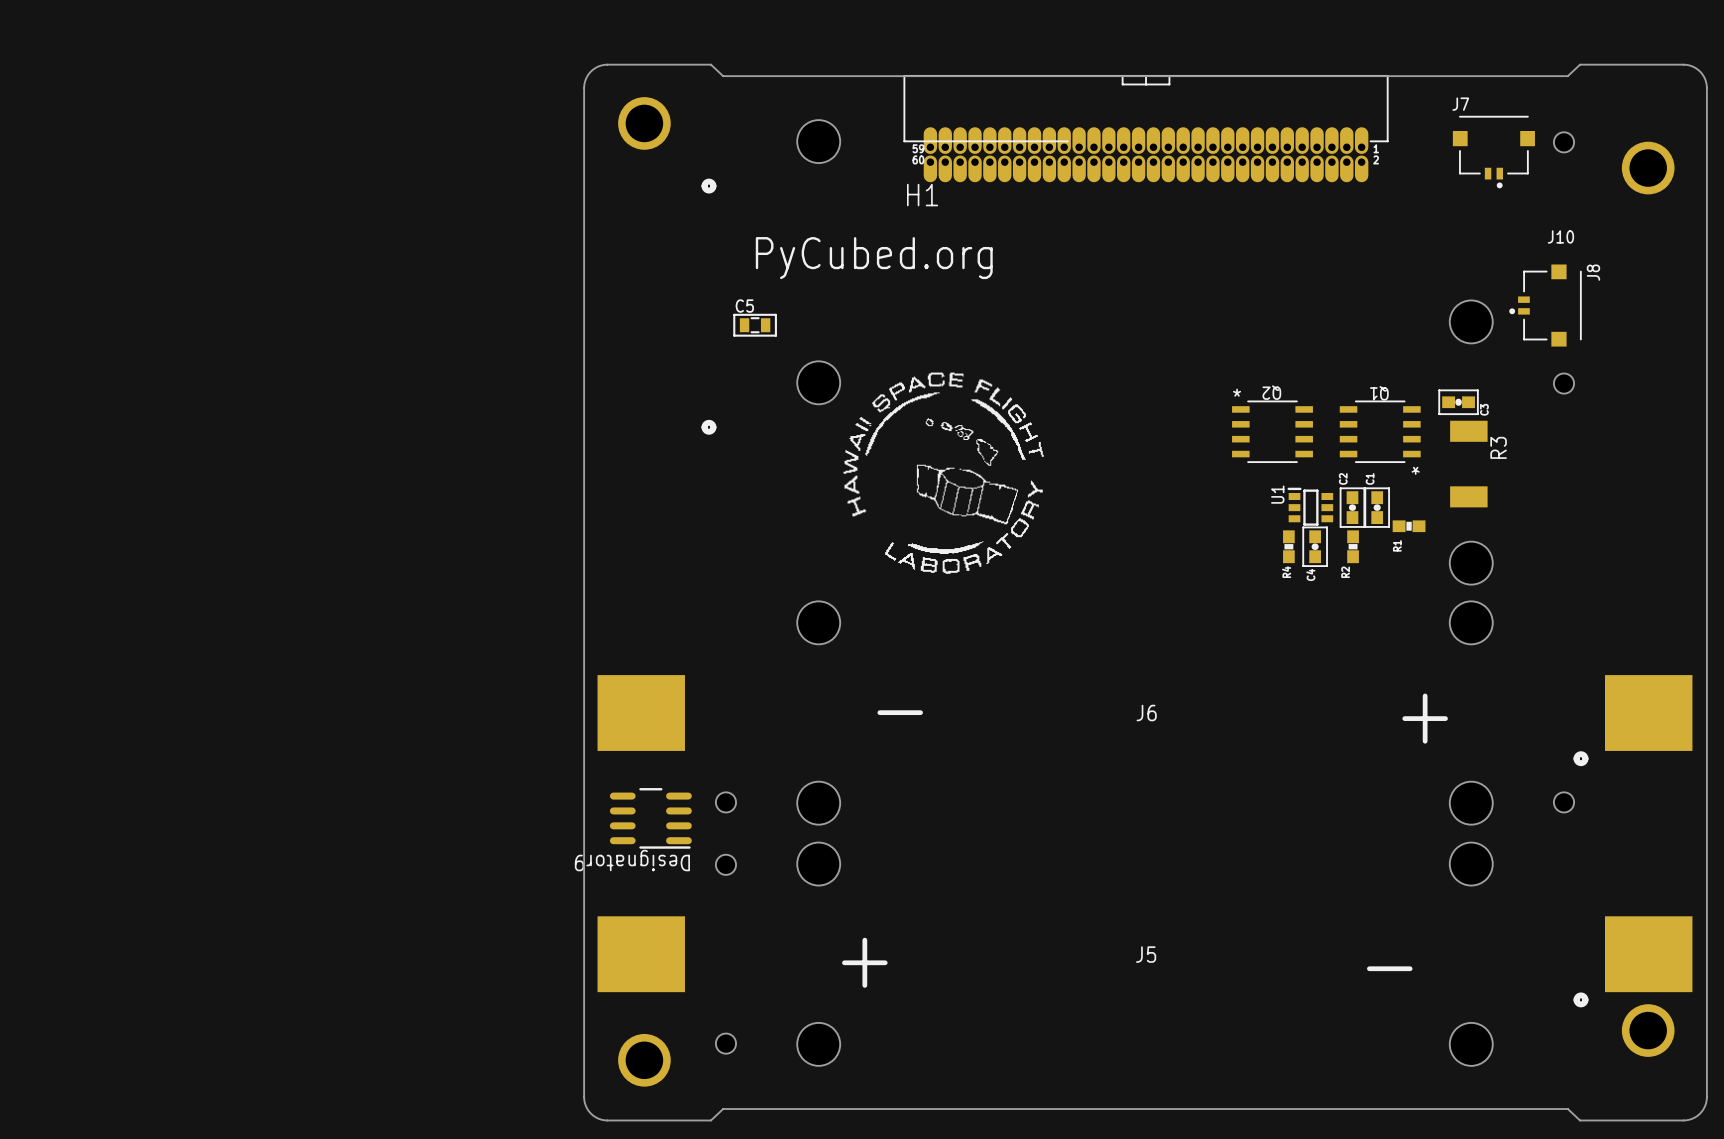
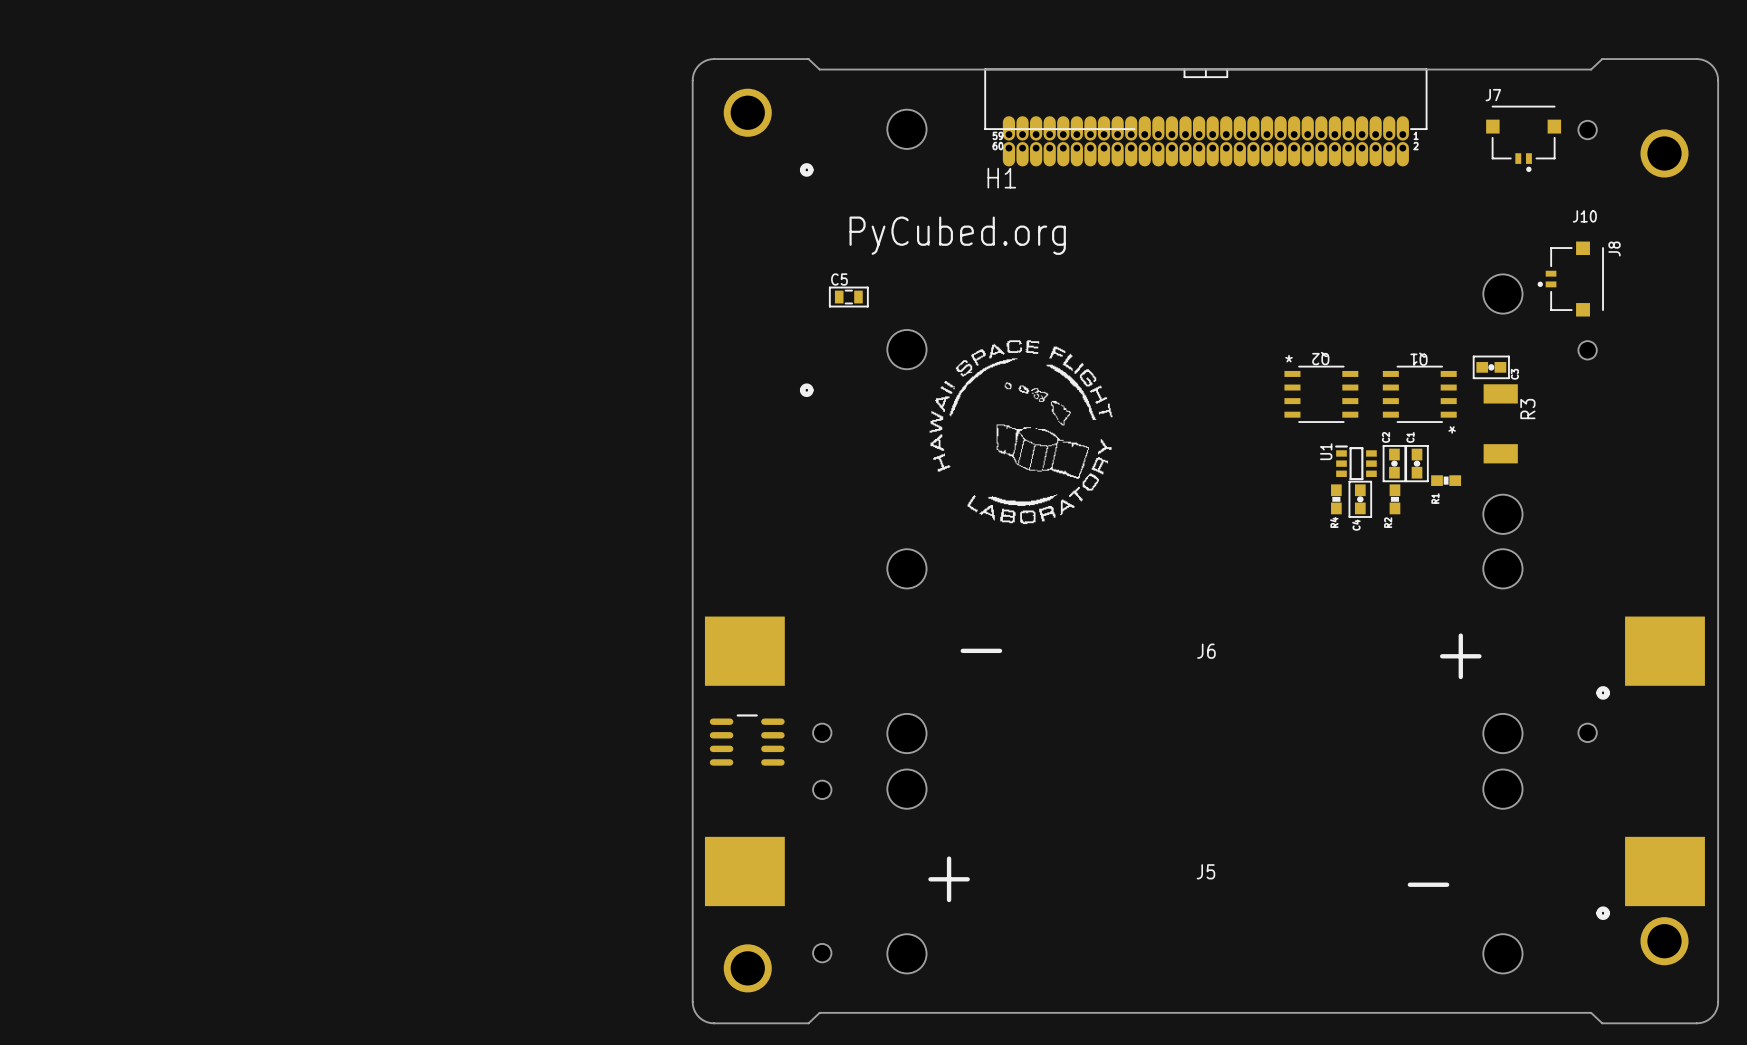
part footprint: [609, 788, 692, 849] -> [709, 714, 785, 766]

